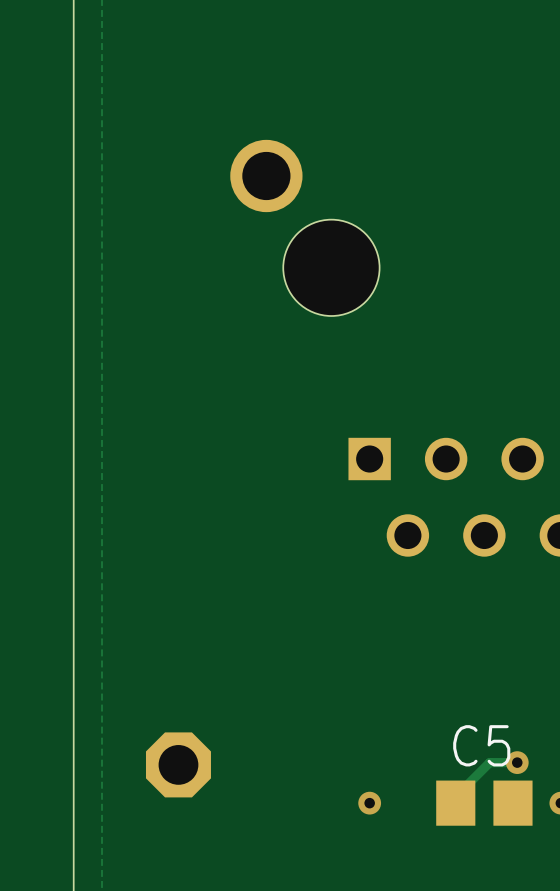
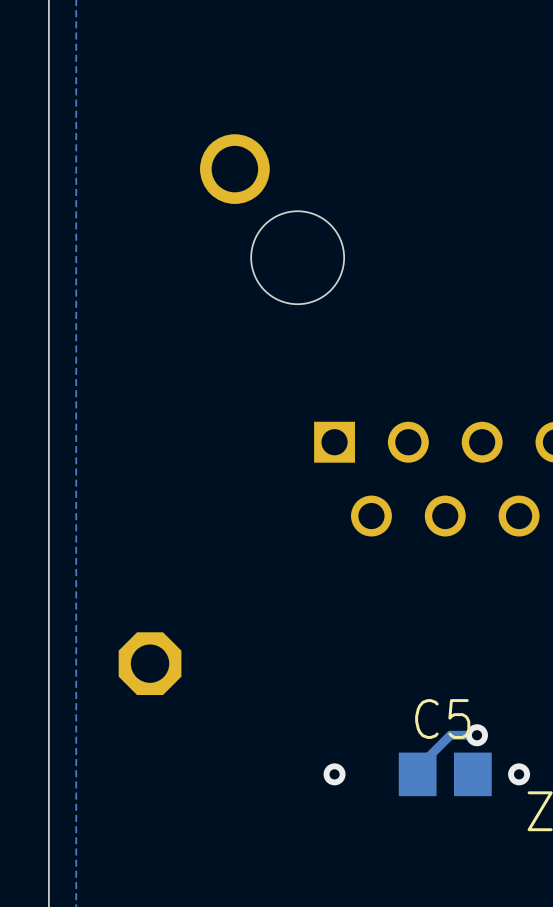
part position: (178, 764) -> (150, 663)

